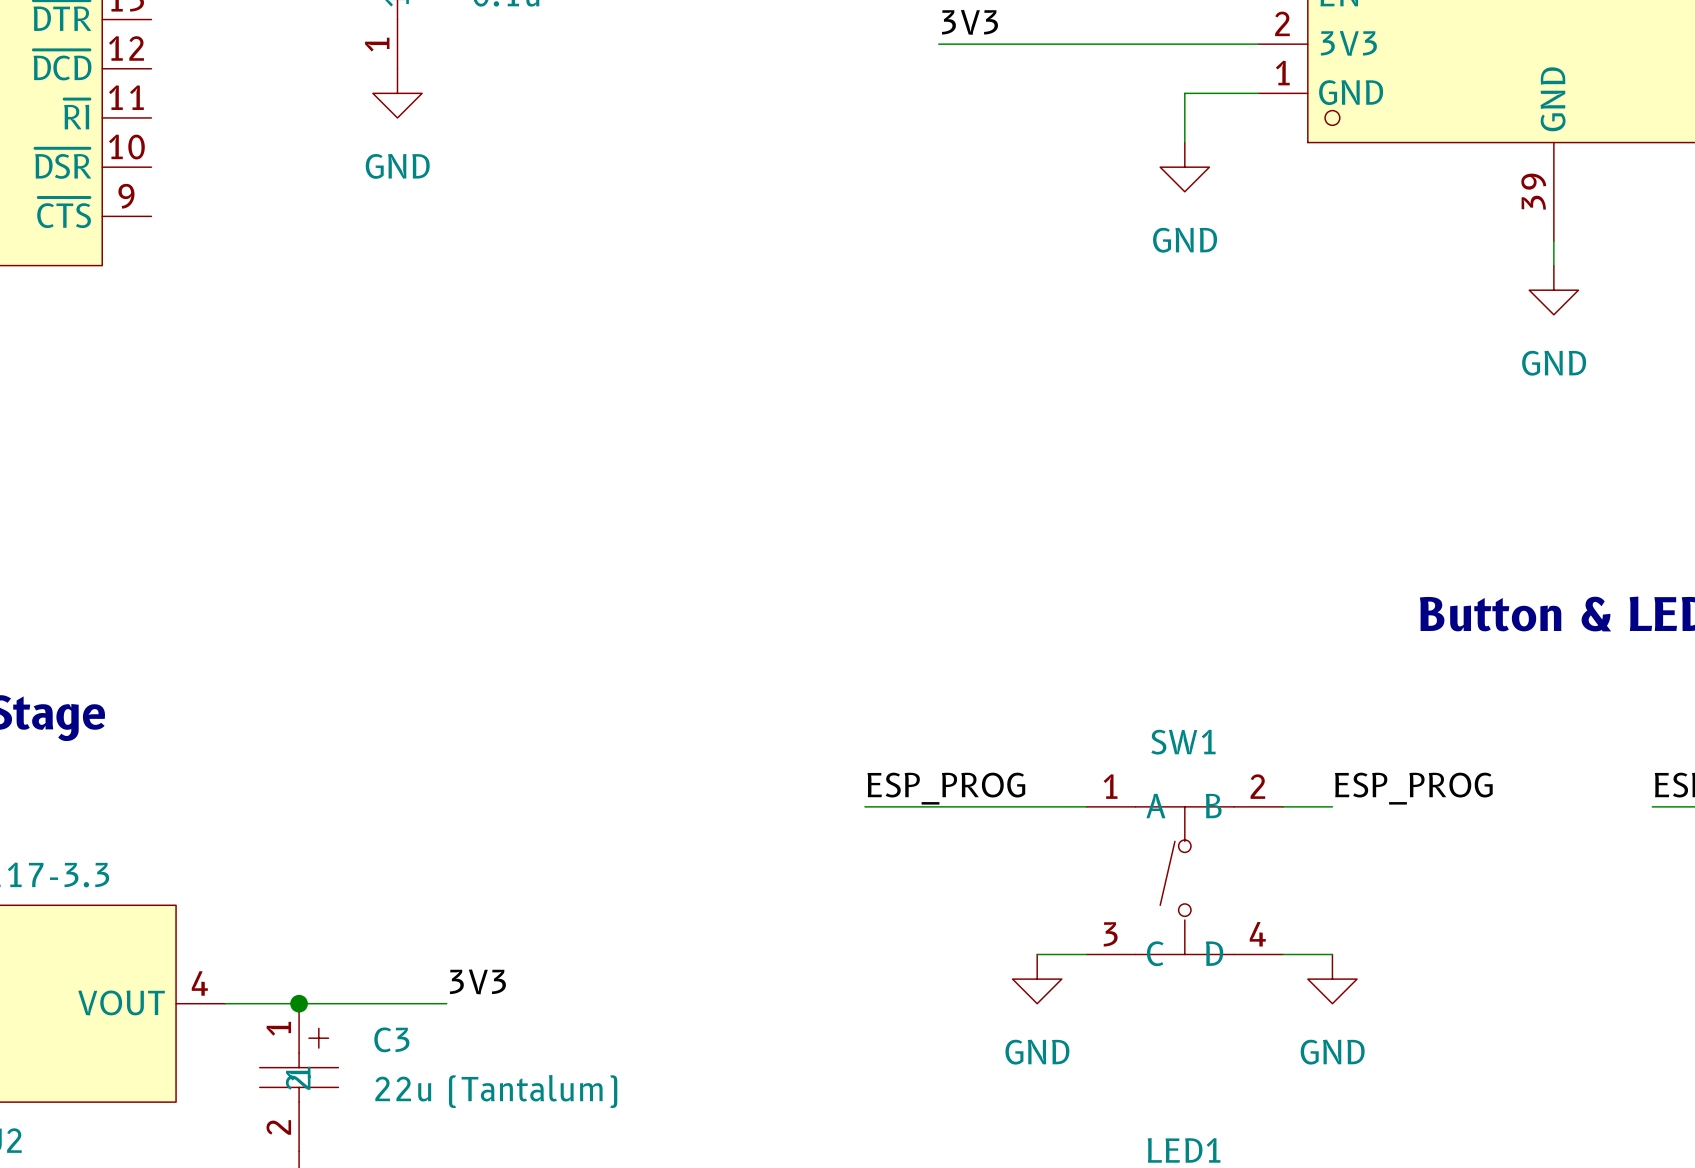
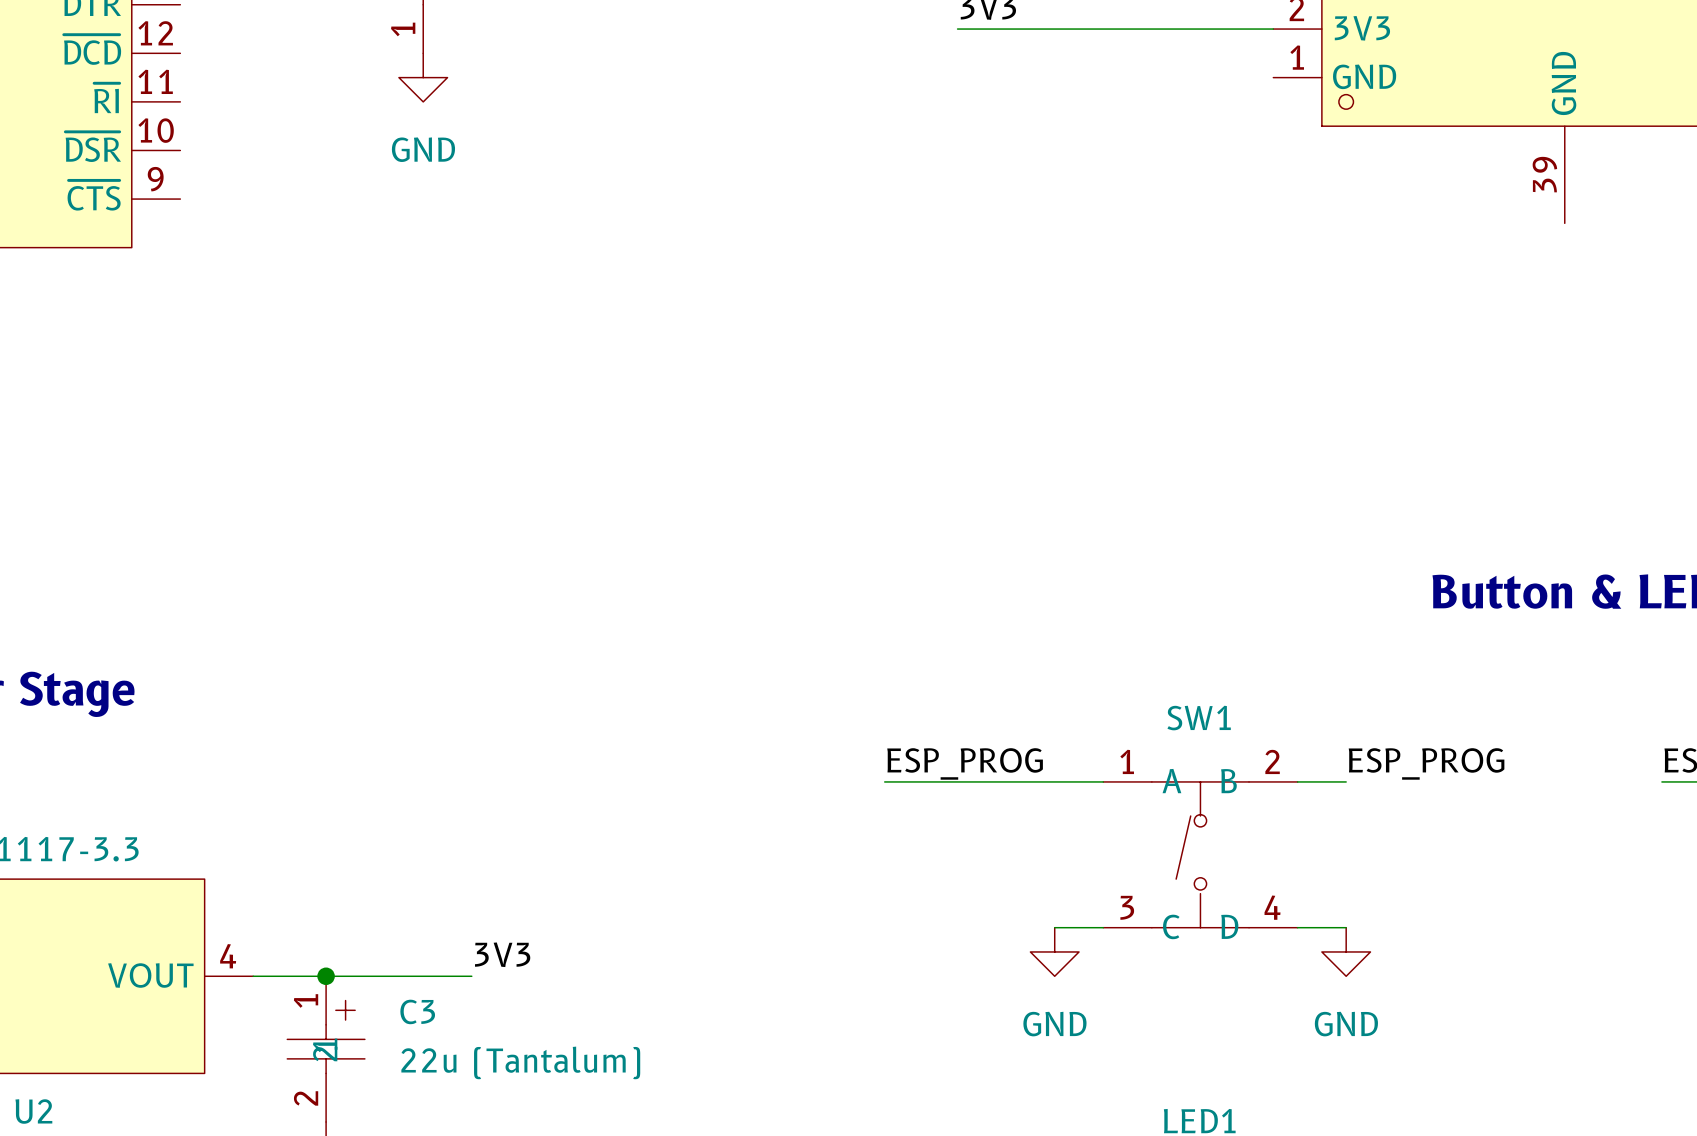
wire: (1258, 93) (1184, 93) (1184, 142) -> none
power symbol: GND (1184, 167) -> none
wire: (1553, 240) (1553, 265) -> none
power symbol: GND (1553, 290) -> none

